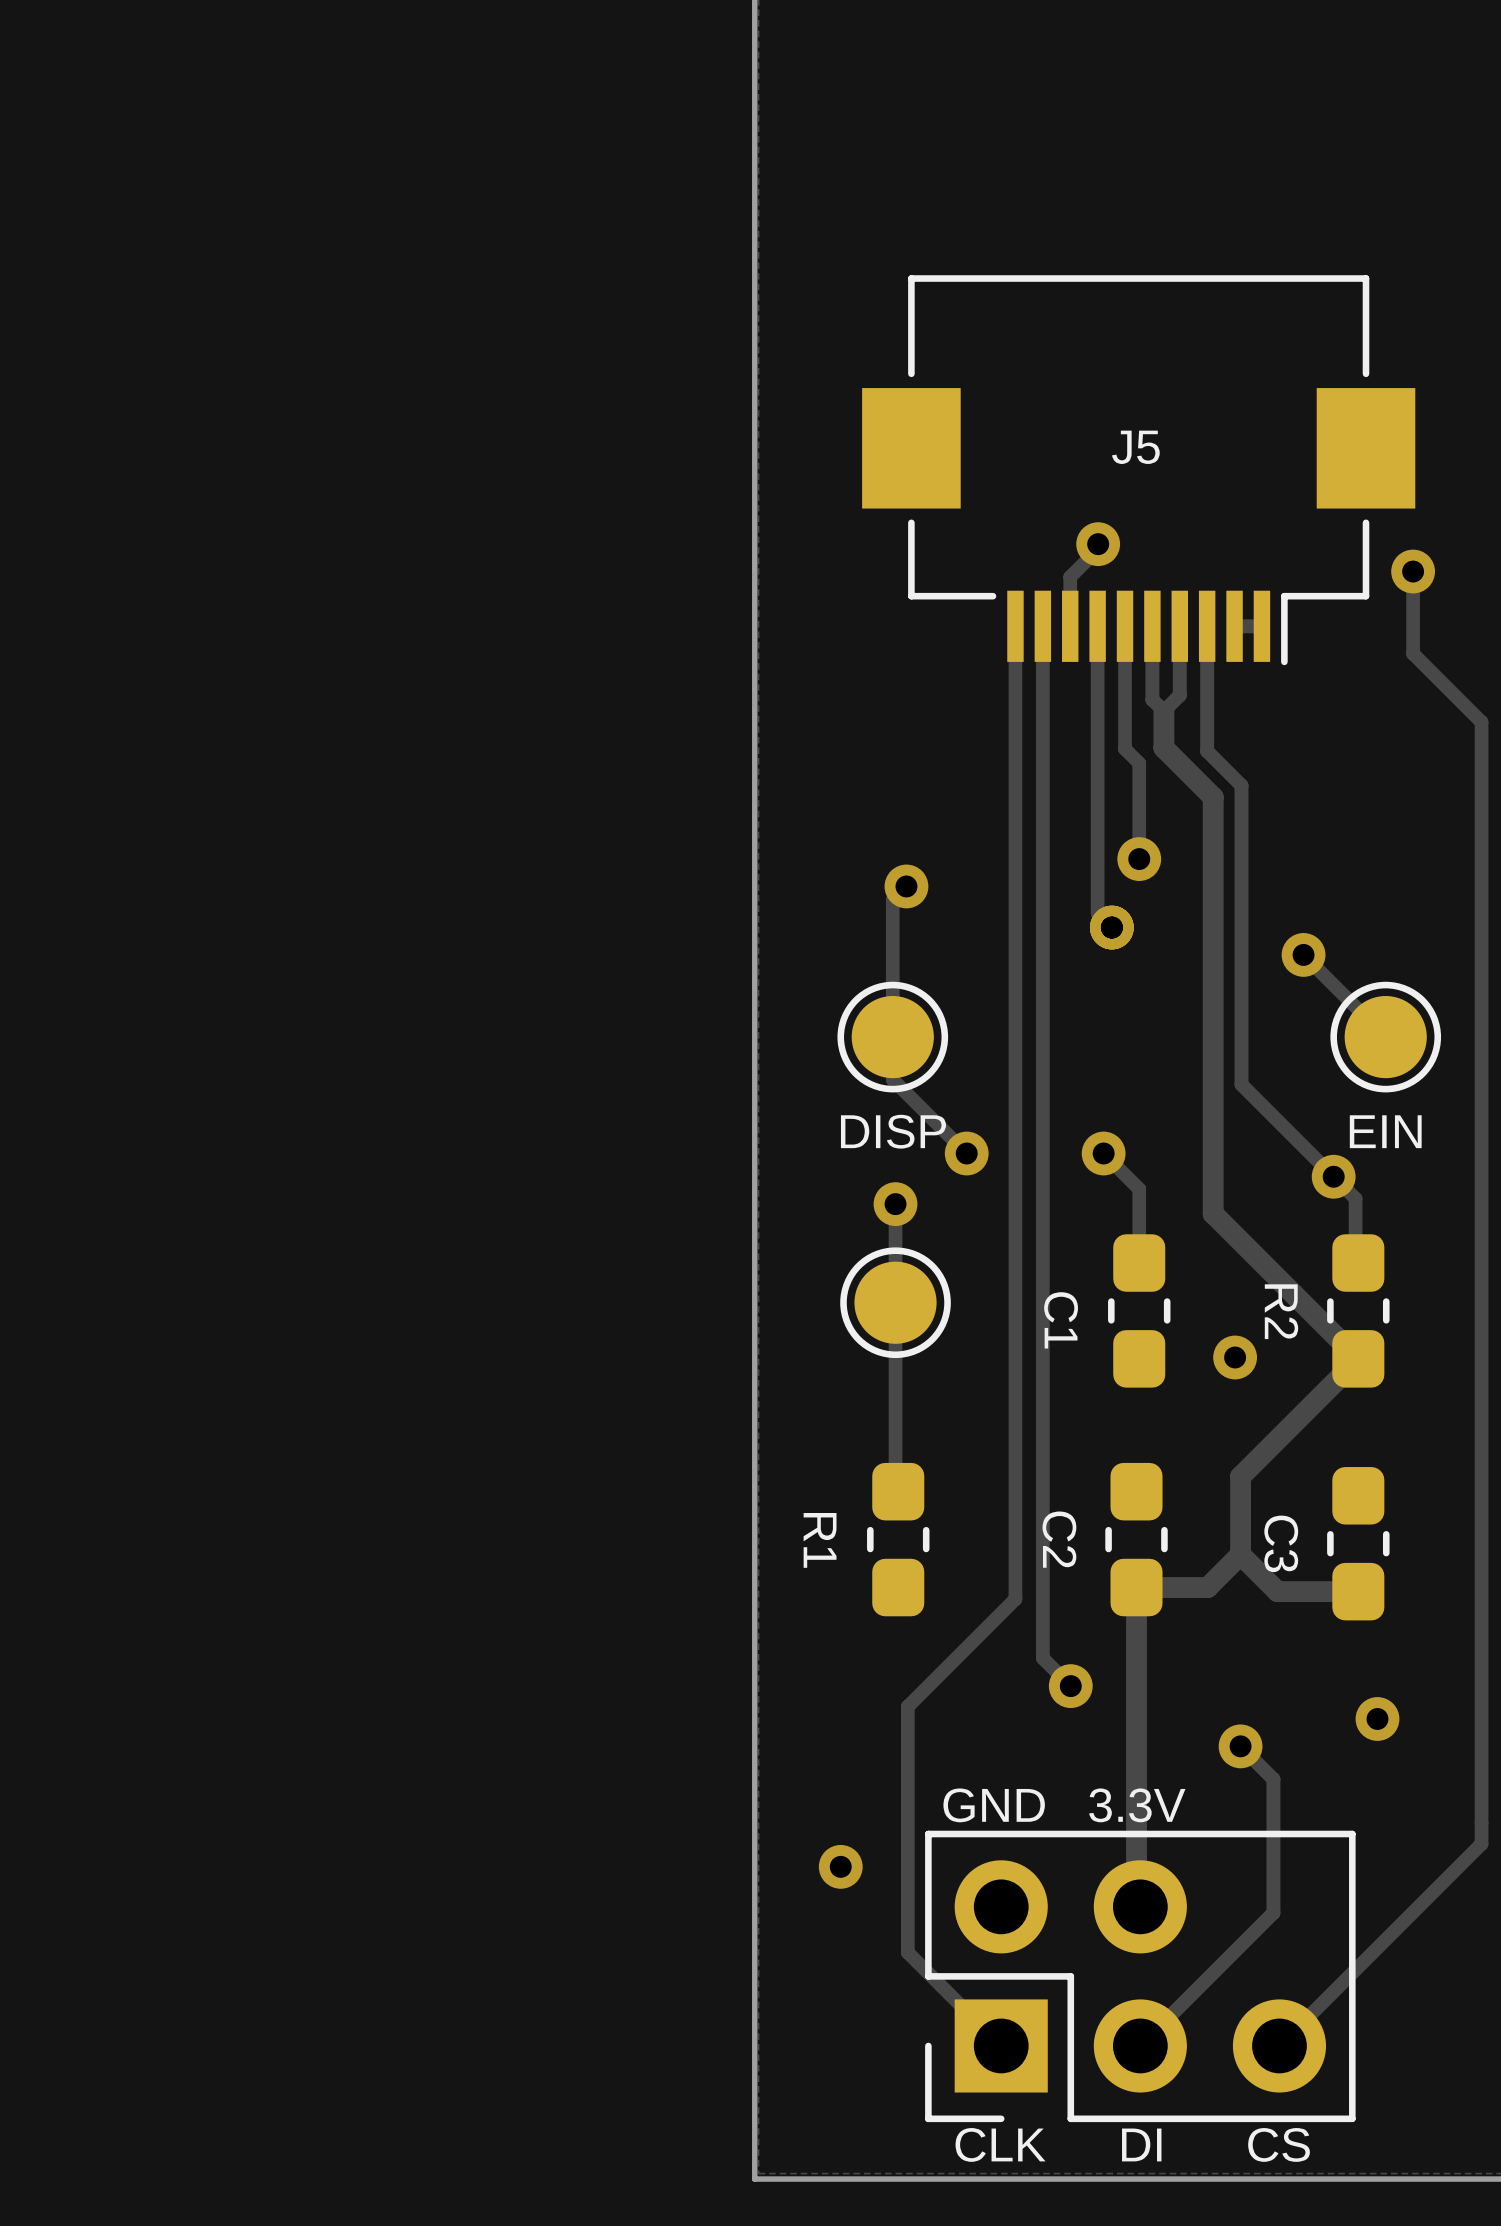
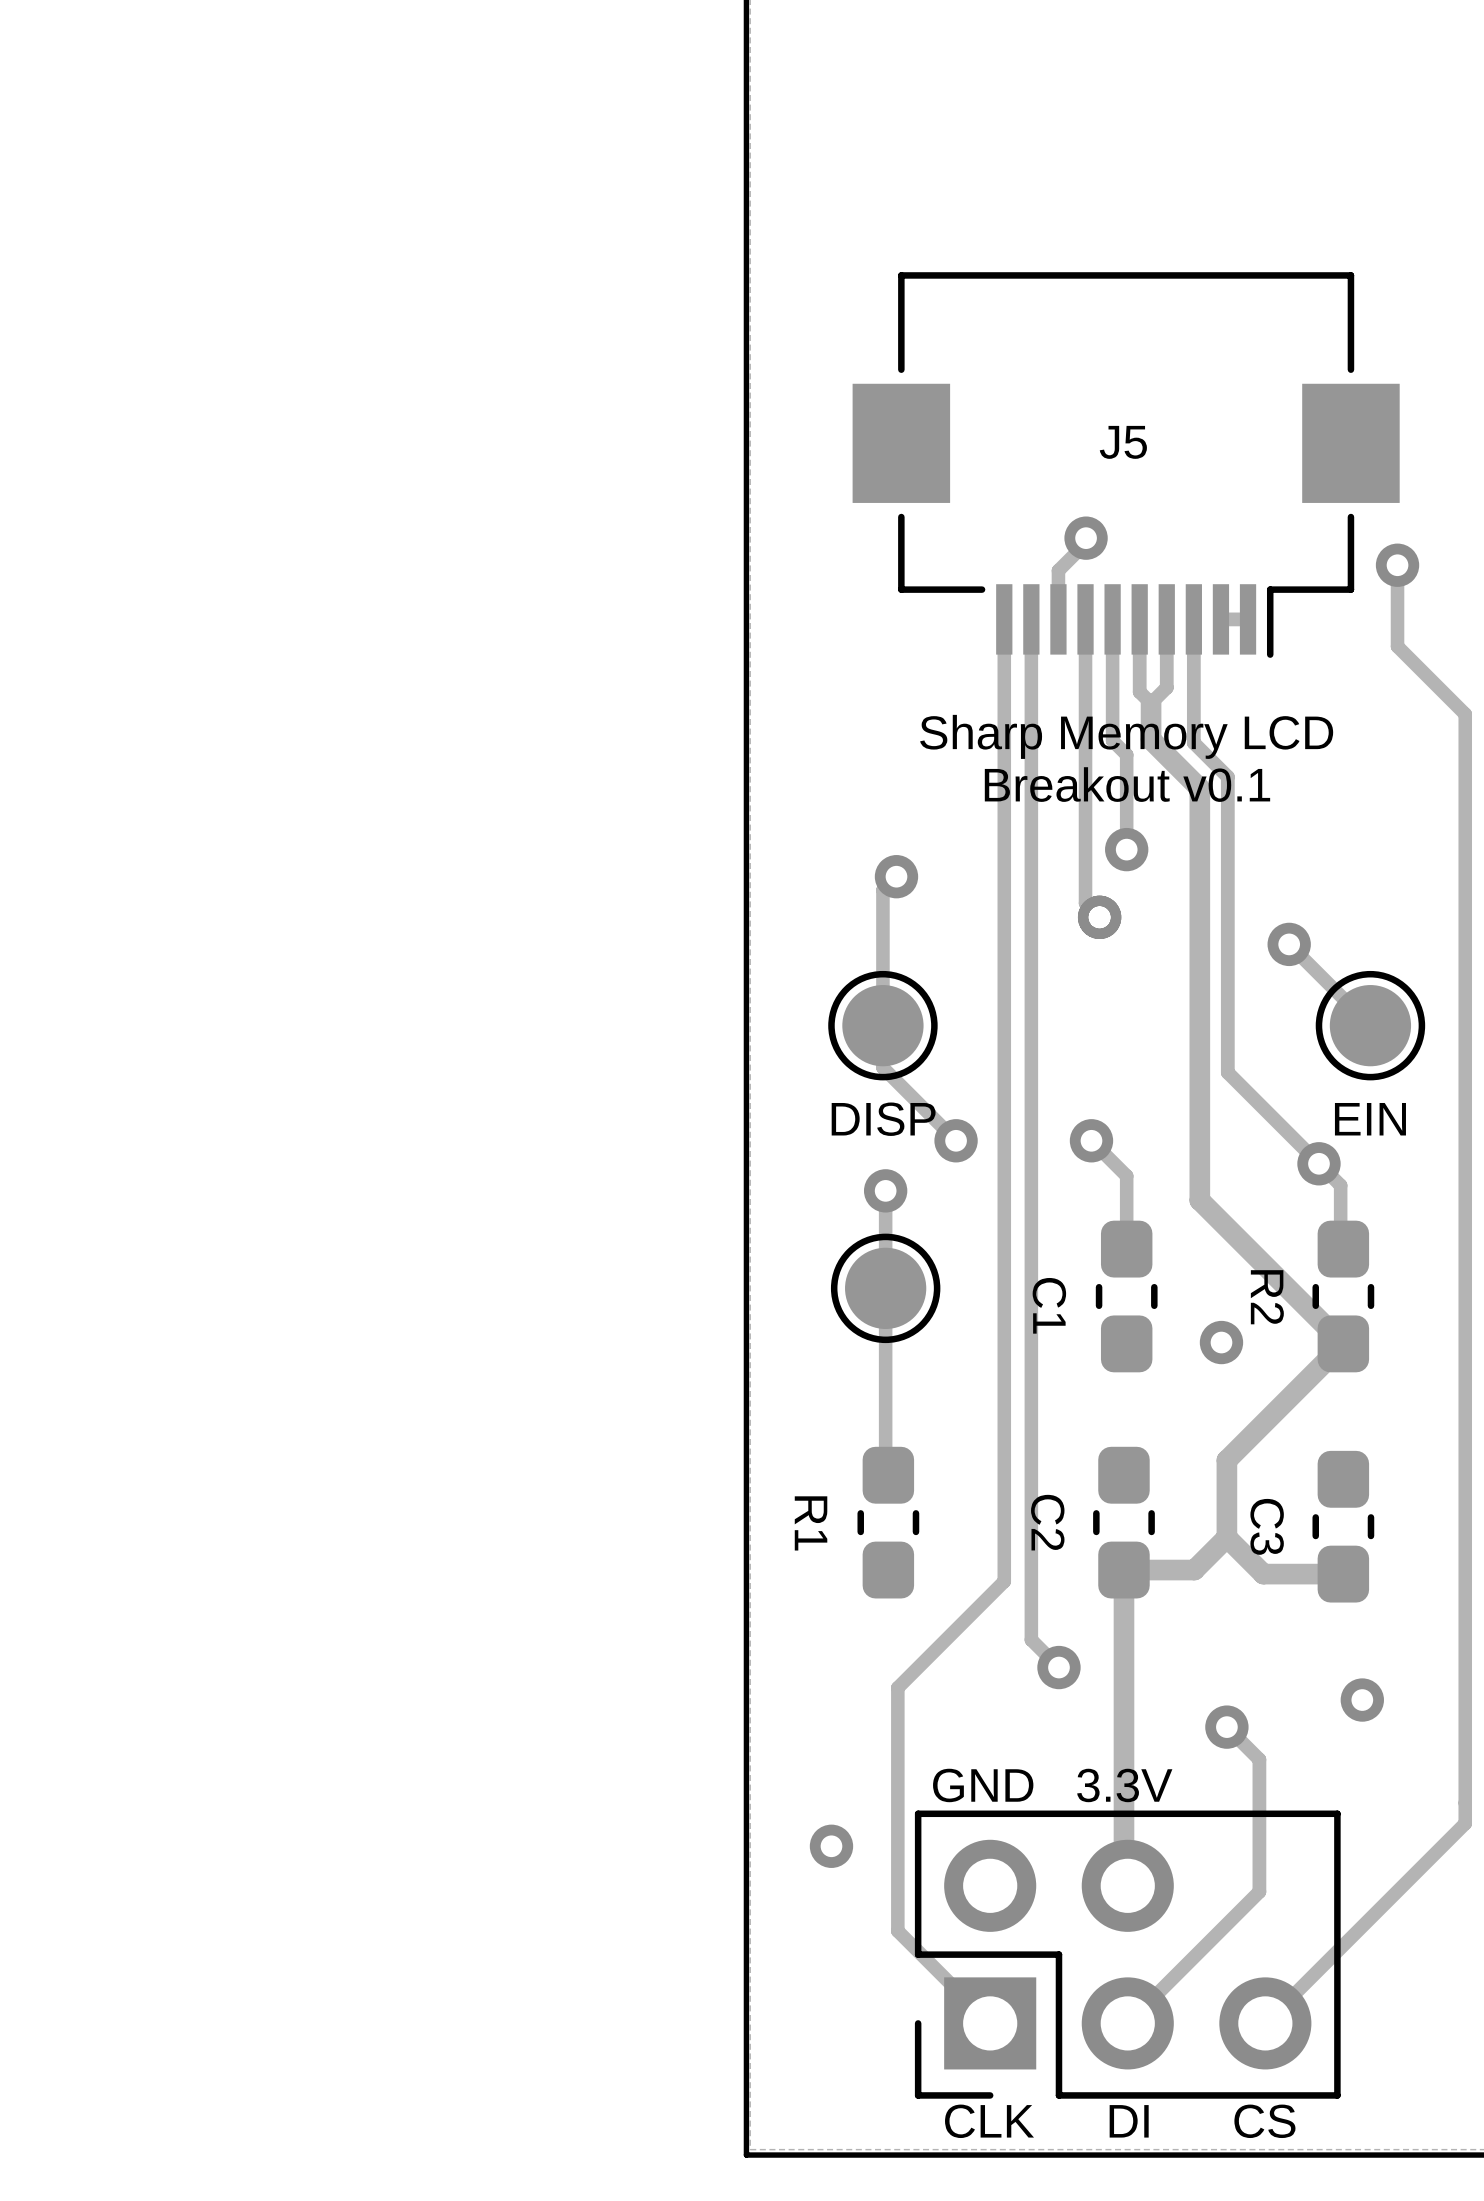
text: none -> Sharp Memory LCD (1126, 736)
text: none -> Breakout v0.1 (1127, 784)

